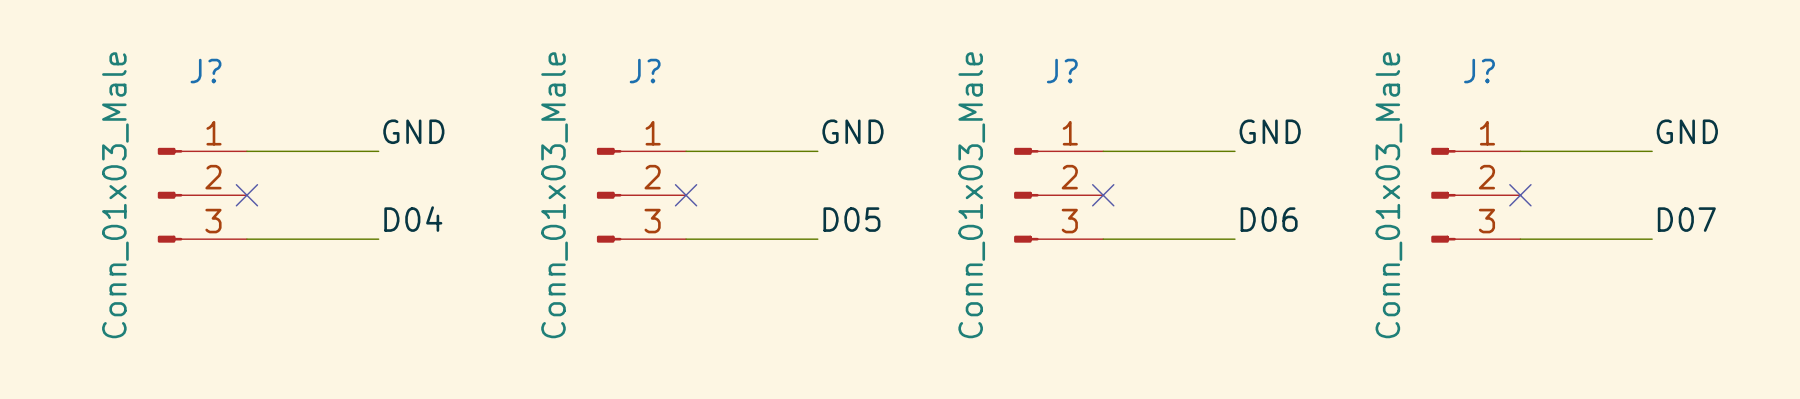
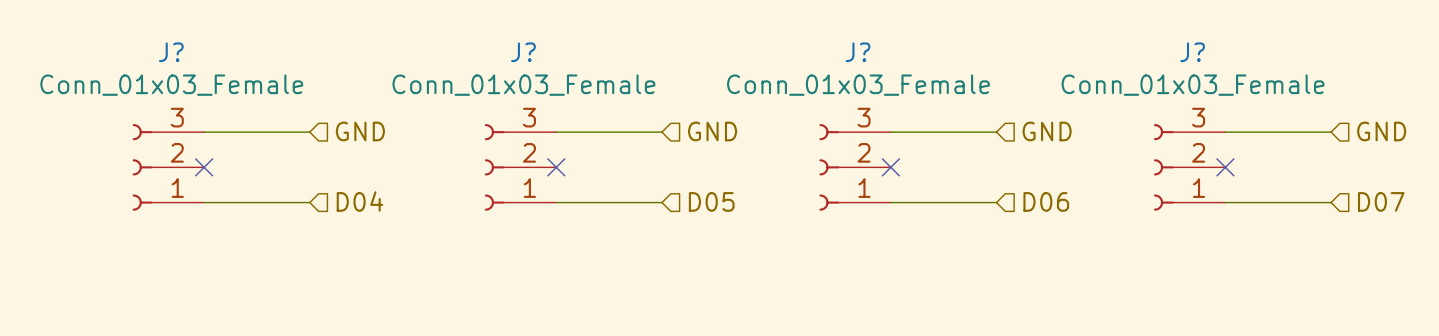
label: GND (413, 131) -> none
label: GND (852, 131) -> none
label: GND (1270, 131) -> none
label: GND (1687, 131) -> none
J? symbol: [157, 147, 247, 243] -> [132, 124, 205, 211]
J? symbol: [596, 147, 687, 243] -> [484, 124, 557, 211]
J? symbol: [1014, 147, 1104, 243] -> [819, 124, 891, 211]
J? symbol: [1431, 147, 1521, 243] -> [1153, 124, 1226, 211]
hierarchical label: none -> GND (360, 131)
hierarchical label: none -> GND (712, 131)
hierarchical label: none -> GND (1047, 131)
hierarchical label: none -> GND (1381, 131)
J? value: Conn_01x03_Male (115, 195) -> Conn_01x03_Female (171, 85)
J? value: Conn_01x03_Male (554, 195) -> Conn_01x03_Female (523, 85)
J? value: Conn_01x03_Male (971, 195) -> Conn_01x03_Female (858, 85)
J? value: Conn_01x03_Male (1388, 195) -> Conn_01x03_Female (1193, 85)
label: D04 (413, 219) -> none
label: D05 (851, 219) -> none
label: D06 (1269, 219) -> none
label: D07 (1686, 219) -> none
hierarchical label: none -> D04 (359, 201)
hierarchical label: none -> D05 (711, 201)
hierarchical label: none -> D06 (1046, 201)
hierarchical label: none -> D07 (1381, 201)

